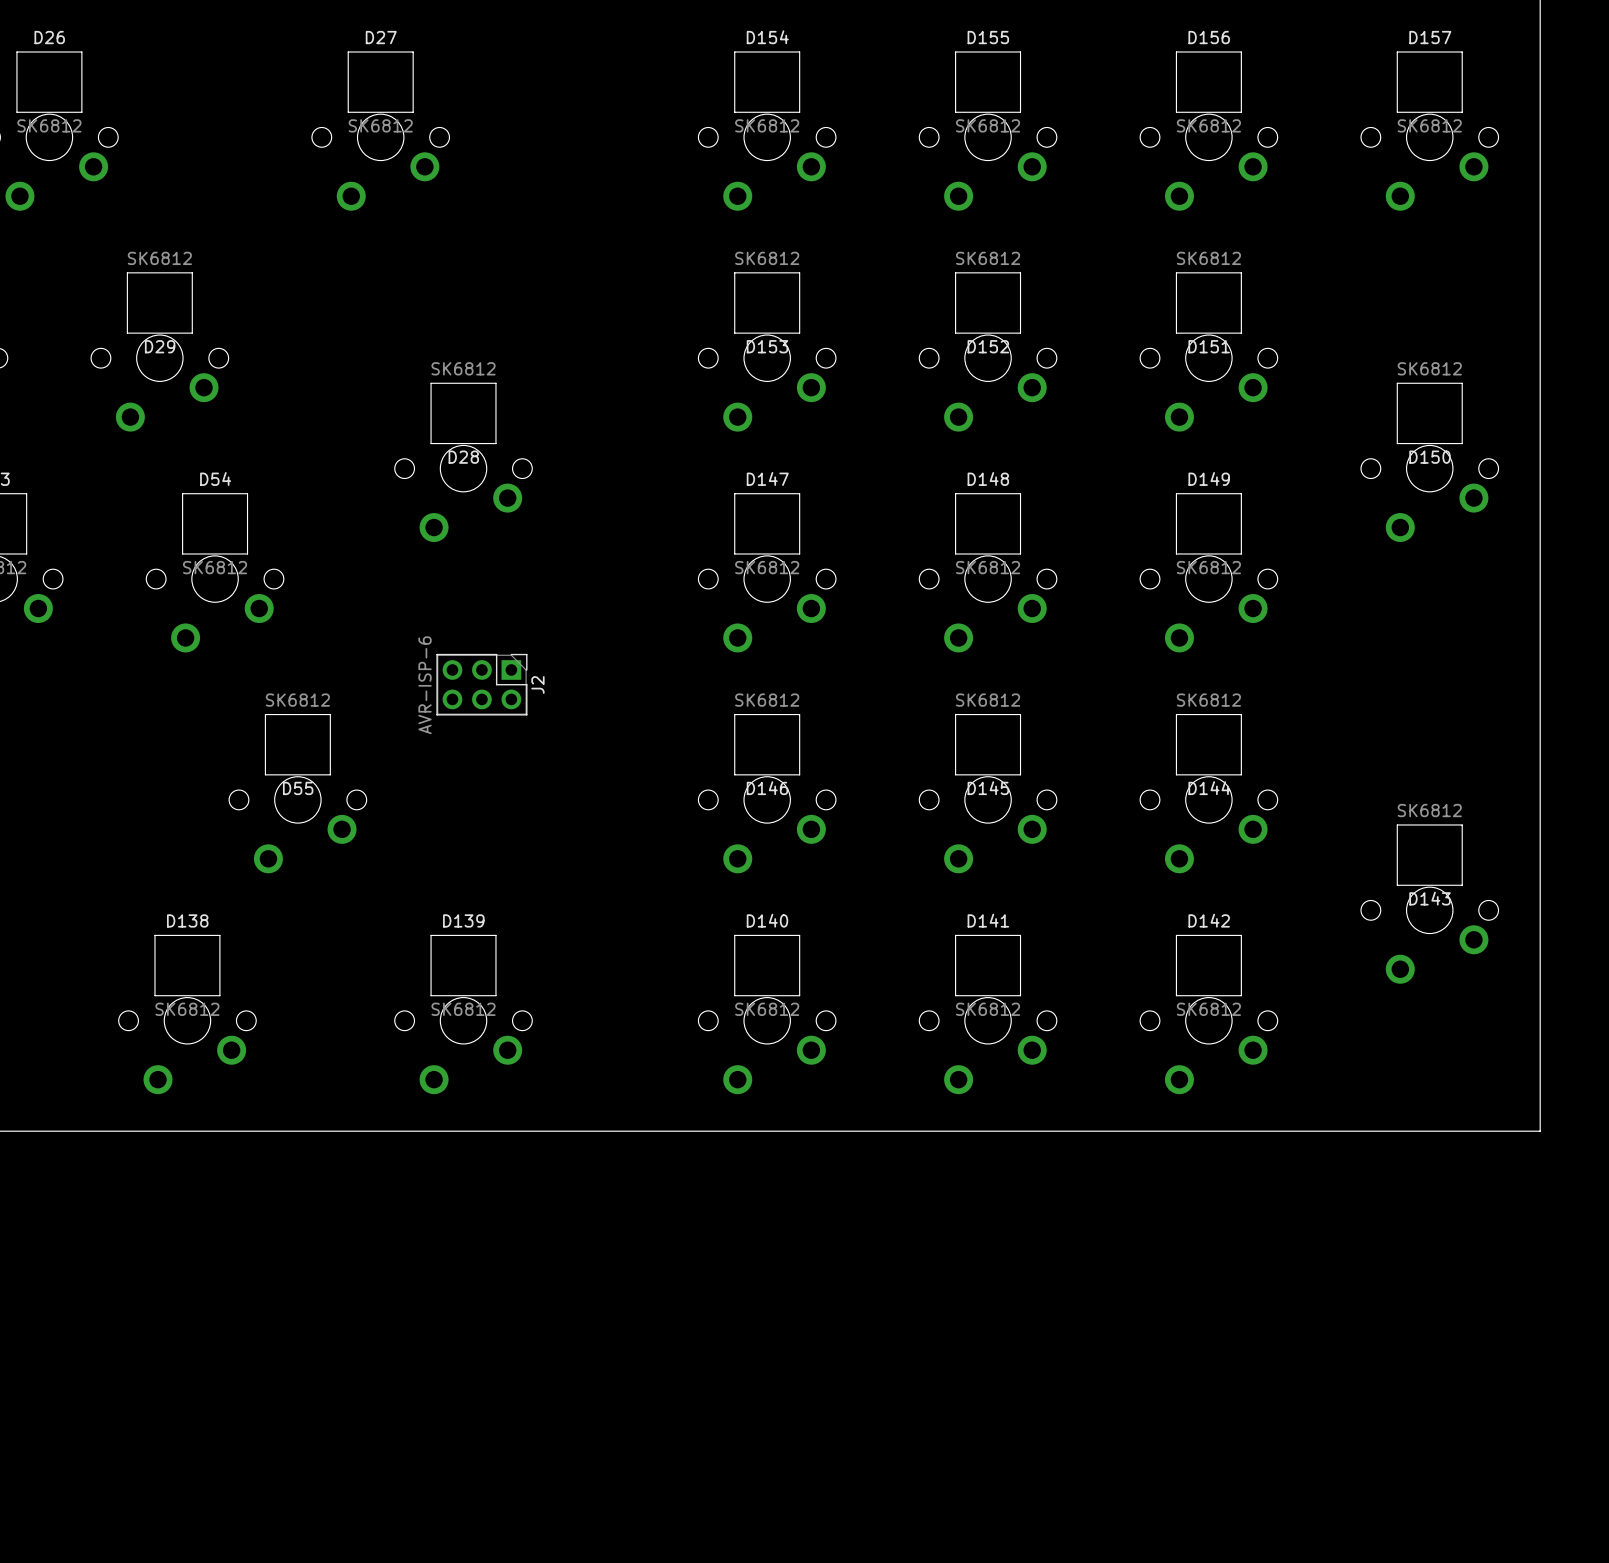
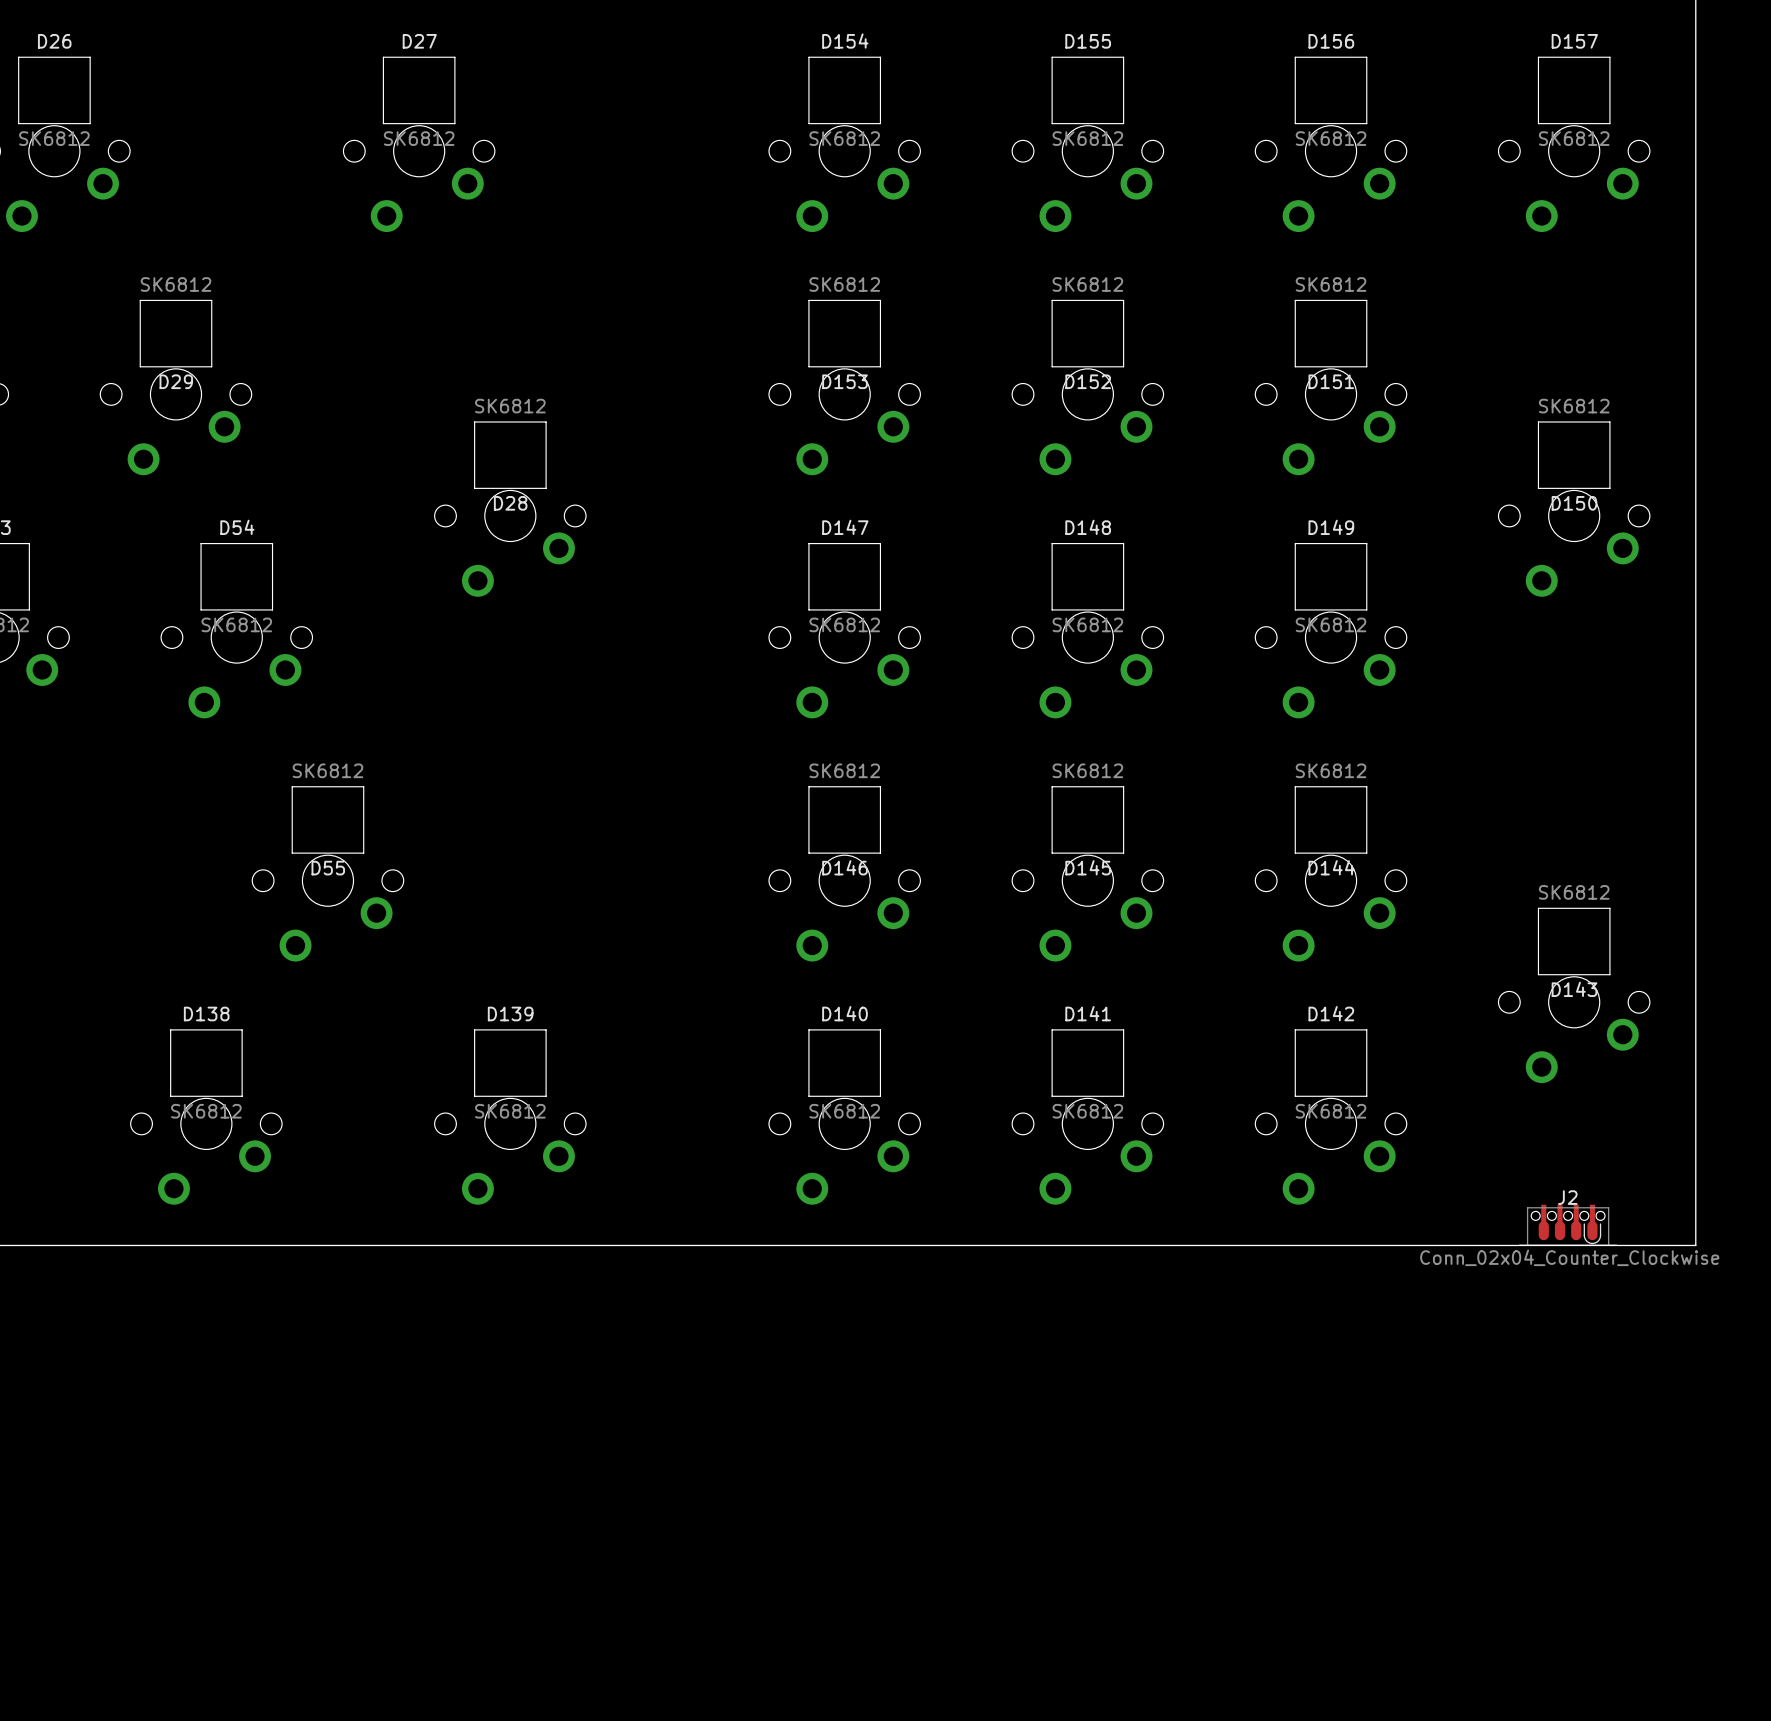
J2 footprint: [436, 653, 528, 716] -> [1518, 1204, 1618, 1246]
J2 name position: J2 (537, 684) -> J2 (1567, 1197)
J2 value: AVR-ISP-6 (425, 685) -> Conn_02x04_Counter_Clockwise (1569, 1257)

